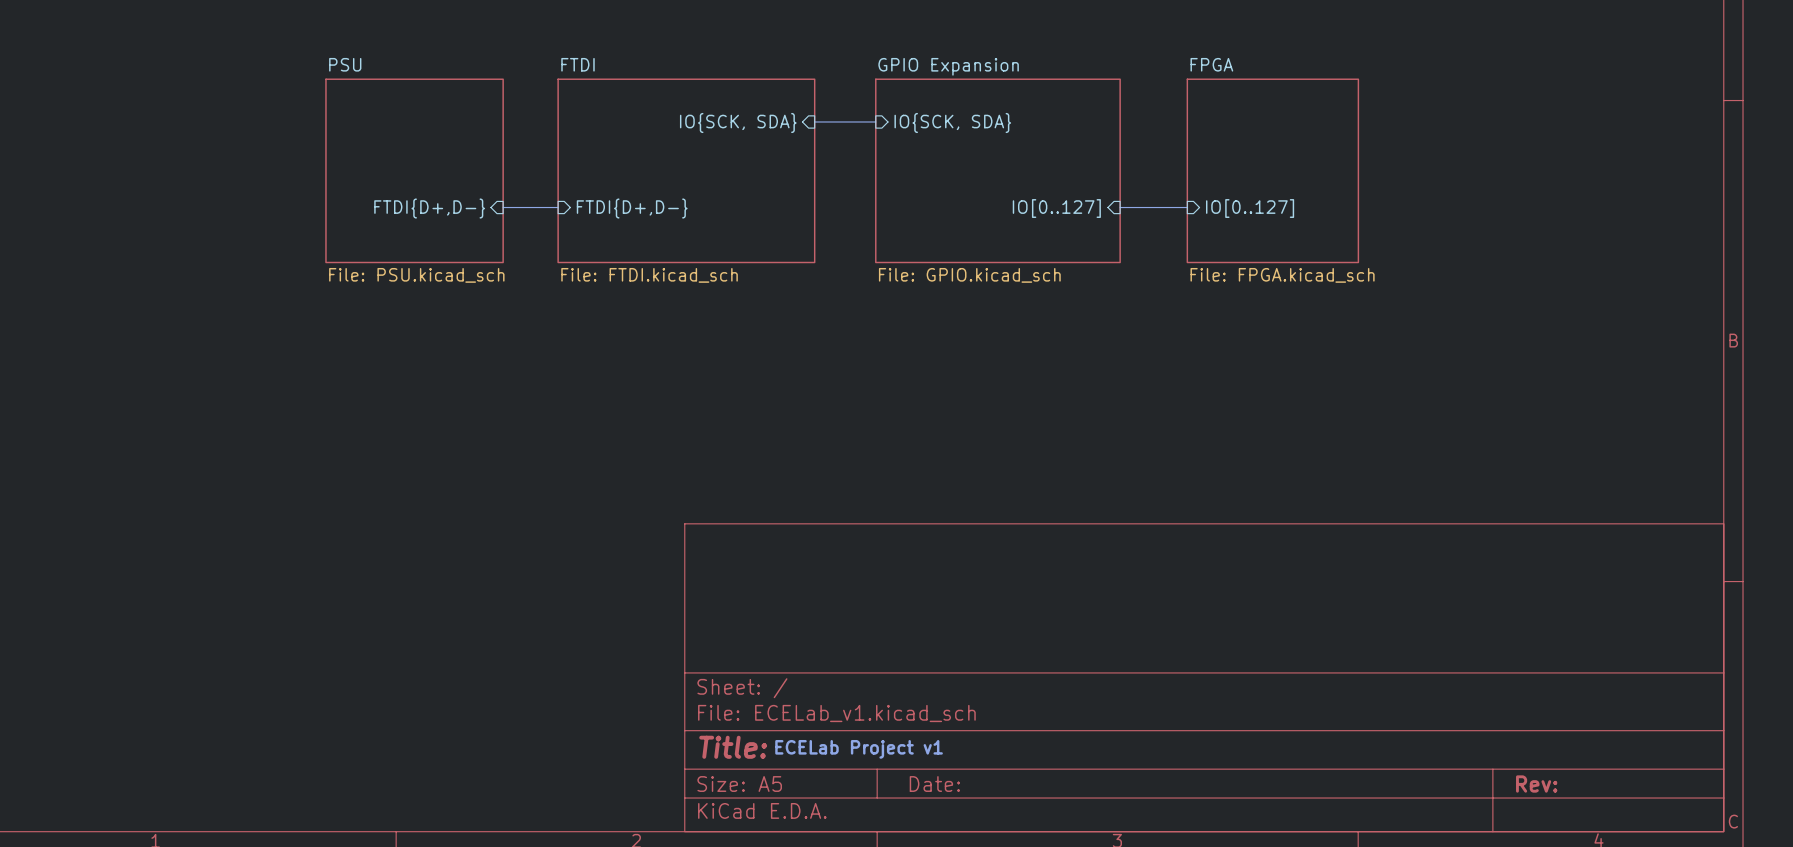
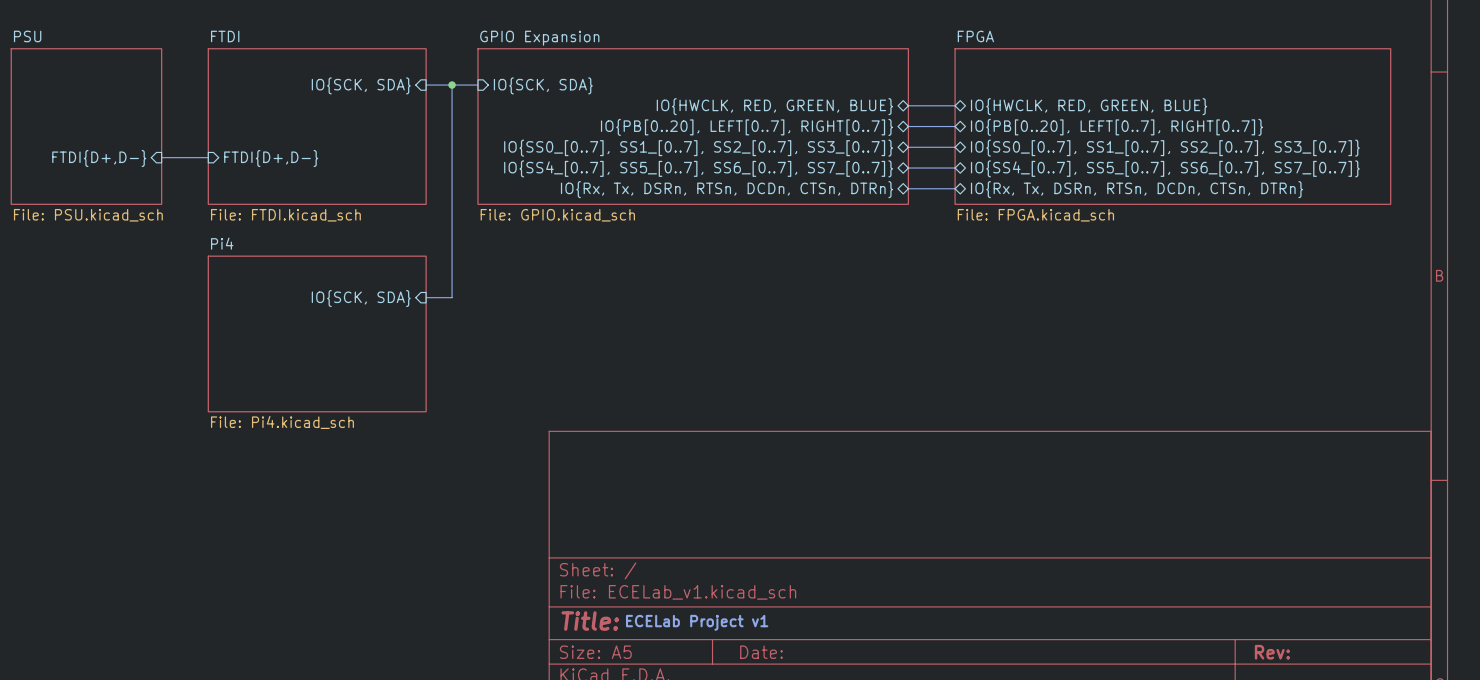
bus: none -> (426, 85) (477, 85)
bus: none -> (452, 85) (452, 297) (426, 297)
junction: none -> (452, 85)
sheet pin: none -> IO{SCK, SDA} (361, 85)
bus: (814, 121) (875, 121) -> none
sheet pin rotation: 0° (738, 122) -> 180° (543, 85)
sheet pin: IO{SCK, SDA} (952, 122) -> none
bus: none -> (908, 105) (955, 105)
sheet pin: none -> IO{HWCLK, RED, GREEN, BLUE} (774, 106)
sheet pin: none -> IO{HWCLK, RED, GREEN, BLUE} (1089, 106)
sheet PSU: none -> File: PSU.kicad_sch (86, 126)
sheet FTDI: none -> File: FTDI.kicad_sch (317, 126)
sheet GPIO Expansion: none -> File: GPIO.kicad_sch (693, 126)
bus: none -> (908, 126) (955, 126)
sheet FPGA: none -> File: FPGA.kicad_sch (1172, 126)
sheet pin: none -> IO{PB[0..20], LEFT[0..7], RIGHT[0..7]} (746, 127)
sheet pin: none -> IO{PB[0..20], LEFT[0..7], RIGHT[0..7]} (1116, 127)
sheet PSU: File: PSU.kicad_sch (414, 170) -> none
sheet FTDI: File: FTDI.kicad_sch (686, 170) -> none
sheet GPIO Expansion: File: GPIO.kicad_sch (997, 170) -> none
sheet FPGA: File: FPGA.kicad_sch (1272, 170) -> none
bus: none -> (908, 147) (955, 147)
sheet pin: none -> IO{SS0_[0..7], SS1_[0..7], SS2_[0..7], SS3_[0..7]} (698, 148)
sheet pin: none -> IO{SS0_[0..7], SS1_[0..7], SS2_[0..7], SS3_[0..7]} (1165, 148)
bus: none -> (161, 157) (208, 157)
sheet pin: none -> FTDI{D+,D-} (99, 158)
bus: (503, 207) (558, 207) -> none
bus: (1120, 207) (1187, 207) -> none
sheet pin rotation: 0° (429, 208) -> 180° (271, 158)
sheet pin: FTDI{D+,D-} (632, 208) -> none
sheet pin: IO[0..127] (1056, 208) -> none
sheet pin: IO[0..127] (1250, 208) -> none
bus: none -> (908, 168) (955, 168)
sheet pin: none -> IO{SS4_[0..7], SS5_[0..7], SS6_[0..7], SS7_[0..7]} (698, 168)
sheet pin: none -> IO{SS4_[0..7], SS5_[0..7], SS6_[0..7], SS7_[0..7]} (1165, 168)
bus: none -> (908, 188) (955, 188)
sheet pin: none -> IO{Rx, Tx, DSRn, RTSn, DCDn, CTSn, DTRn} (726, 189)
sheet pin: none -> IO{Rx, Tx, DSRn, RTSn, DCDn, CTSn, DTRn} (1136, 189)
sheet pin: none -> IO{SCK, SDA} (361, 298)
sheet Pi4: none -> File: Pi4.kicad_sch (317, 333)

